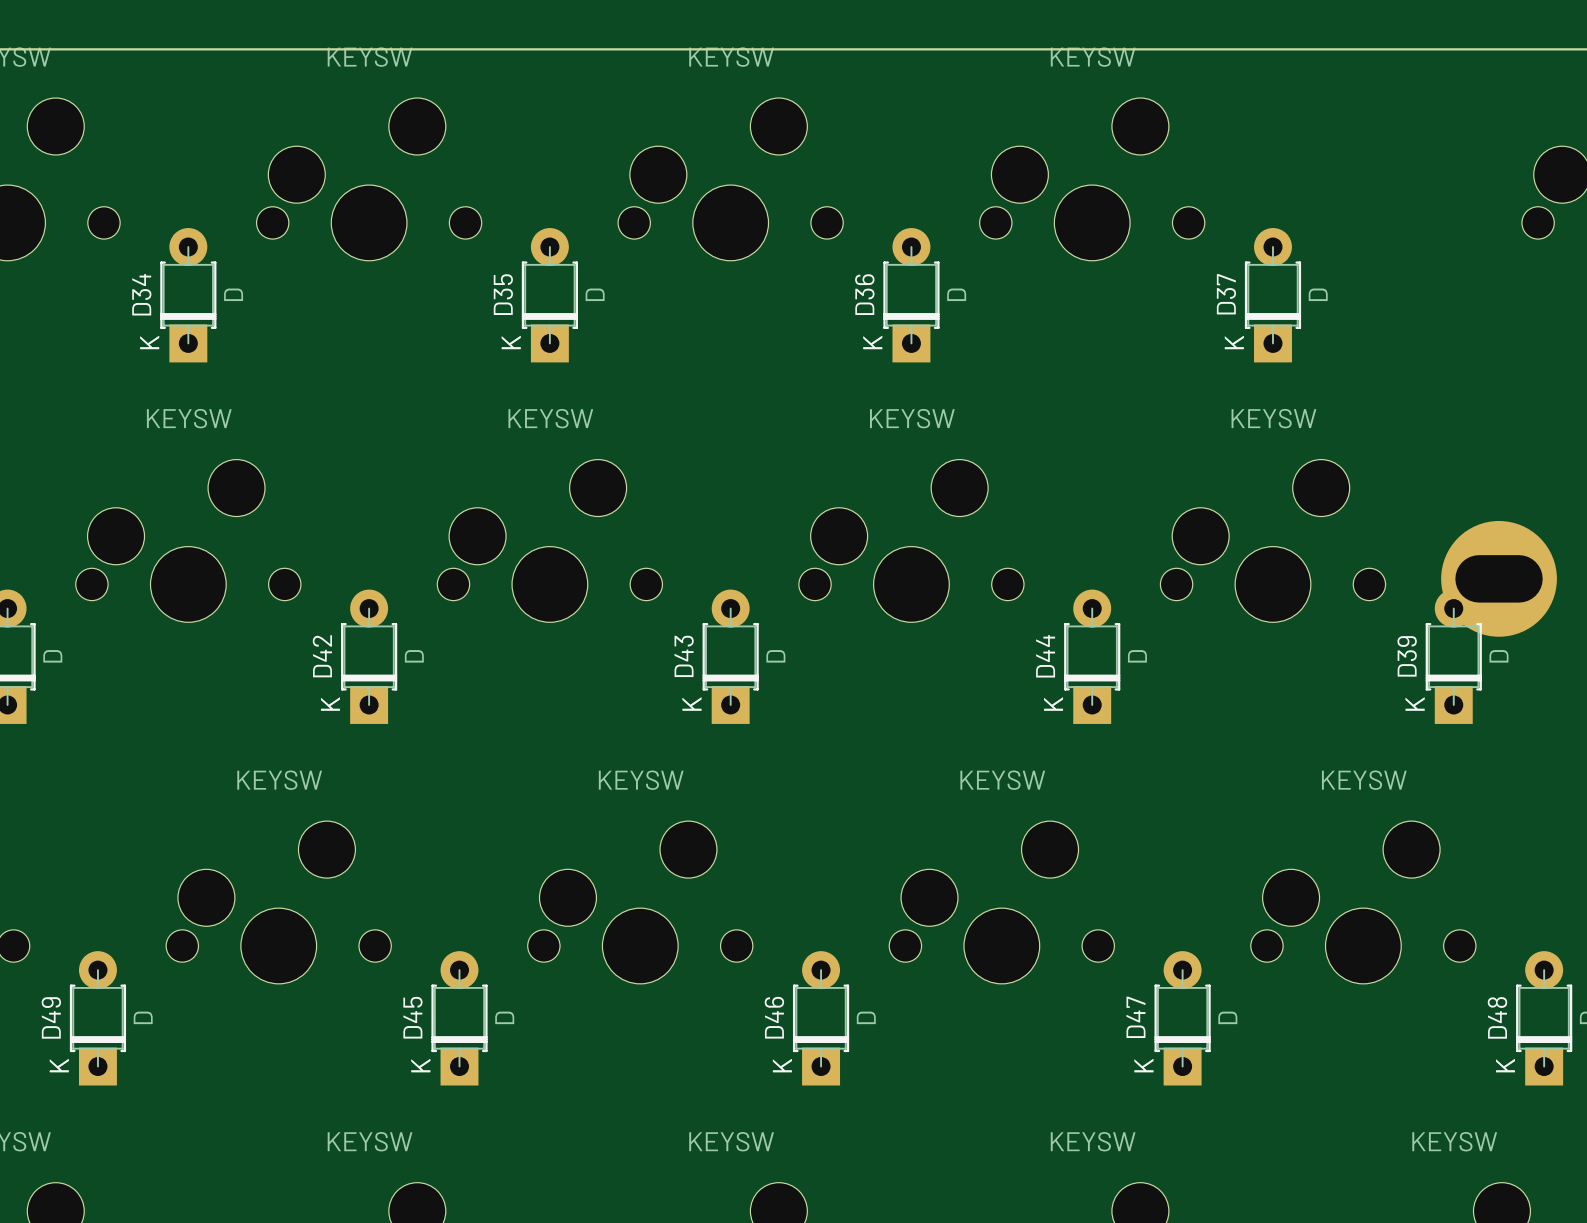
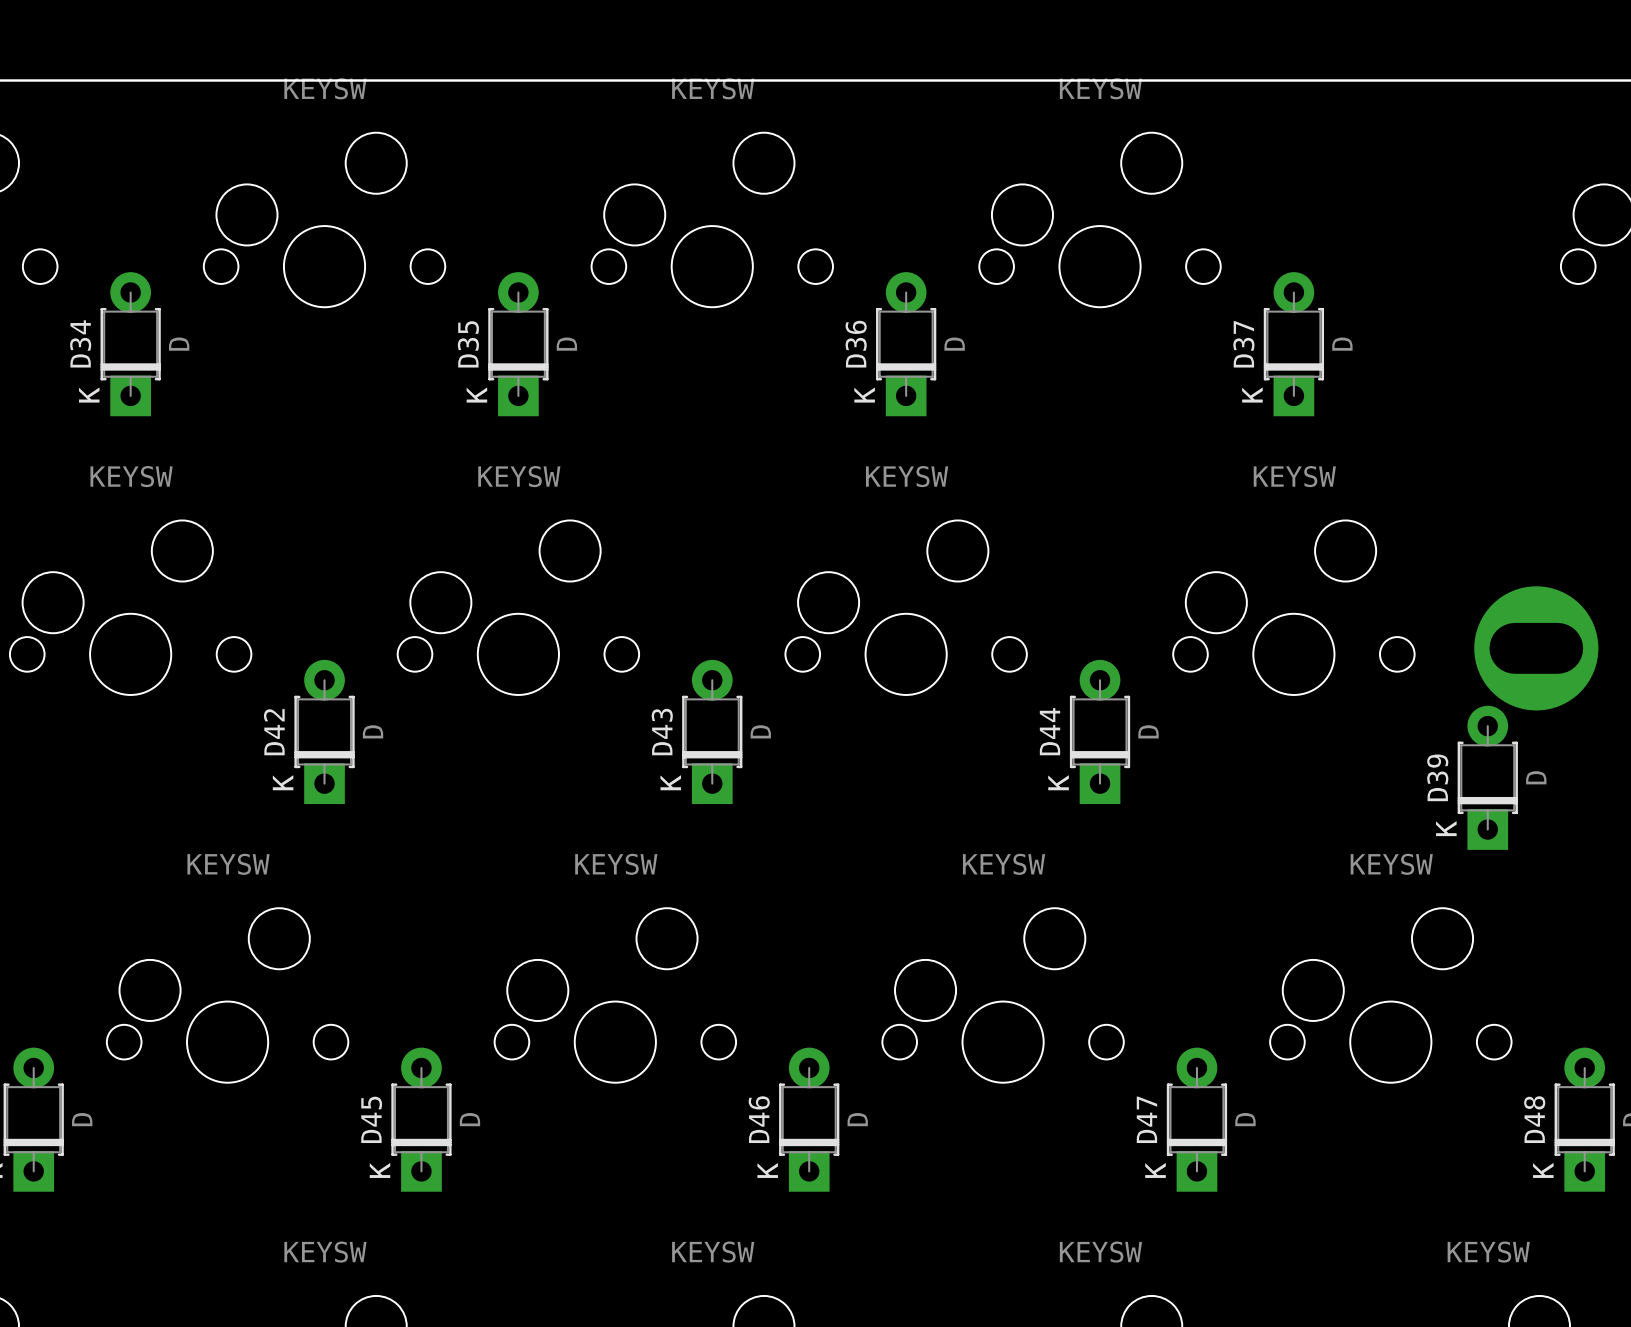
D39 position: (1453, 656) -> (1487, 777)

